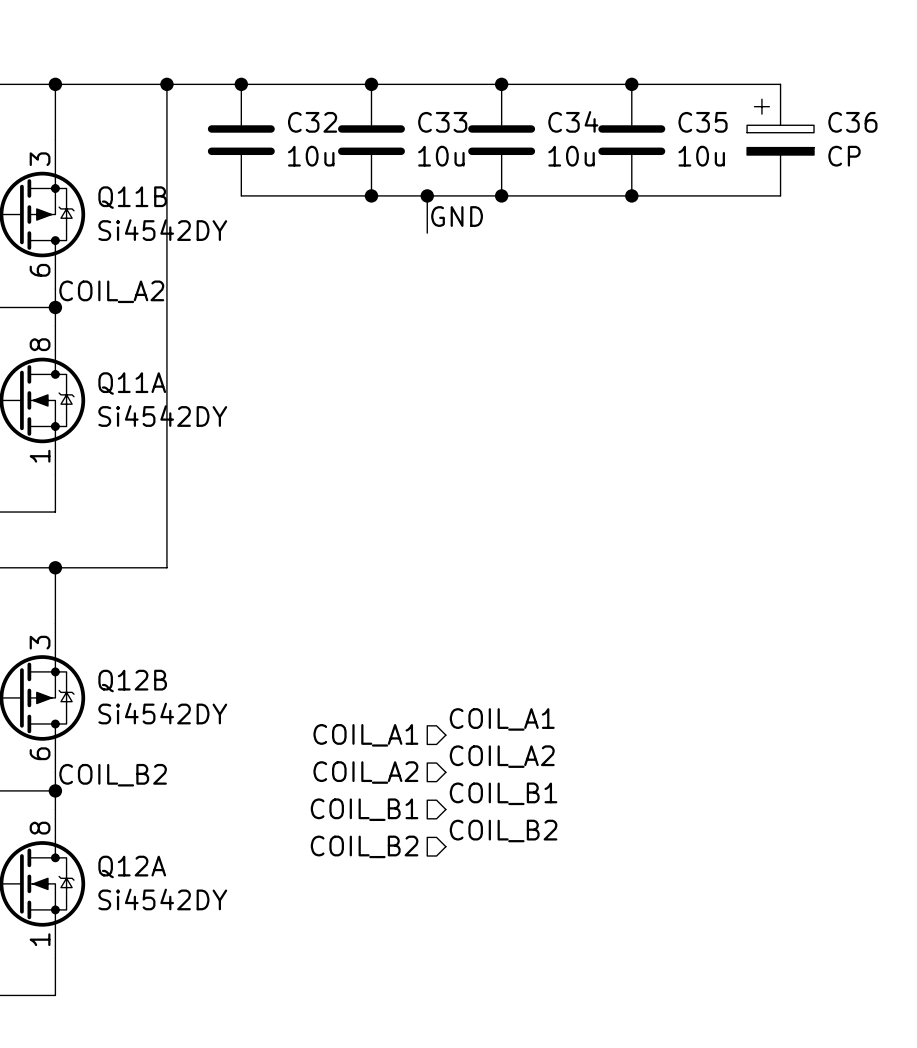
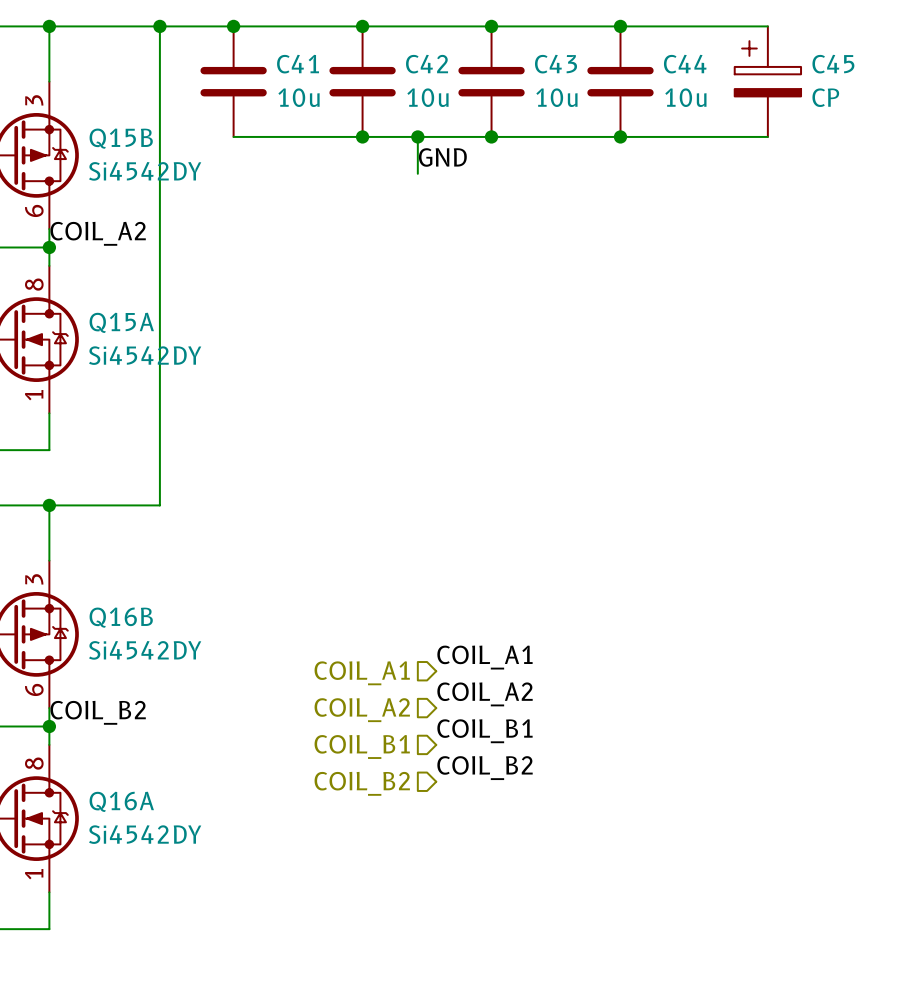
C34 name: C34 (573, 121) -> C43 (556, 64)
C32 name: C32 (312, 122) -> C41 (298, 64)
C33 name: C33 (442, 122) -> C42 (427, 64)
C35 name: C35 (703, 122) -> C44 (685, 64)
C36 name: C36 (852, 122) -> C45 (833, 64)
Q11B name: Q11B (132, 197) -> Q15B (121, 138)
Q11A name: Q11A (132, 383) -> Q15A (121, 322)
Q12B name: Q12B (132, 681) -> Q16B (121, 617)
Q12A name: Q12A (132, 866) -> Q16A (121, 801)

